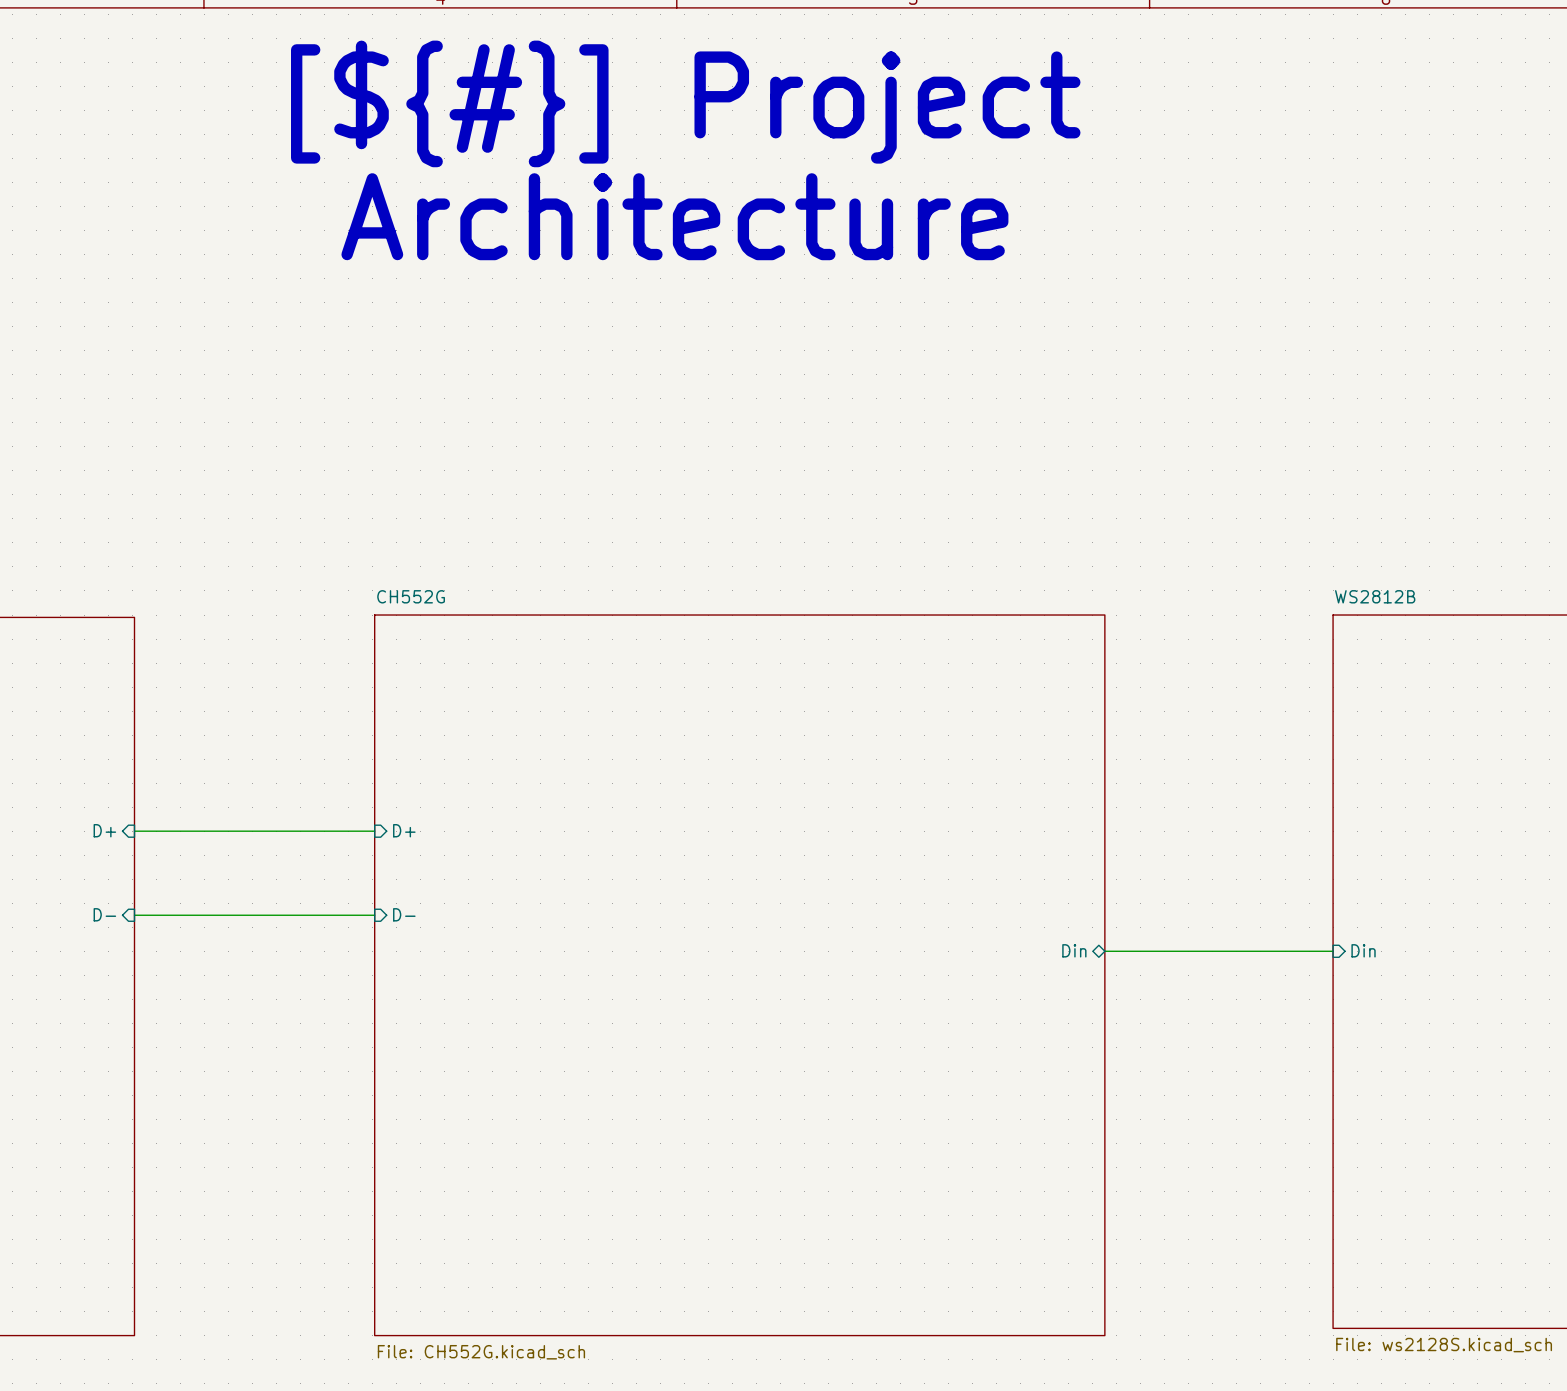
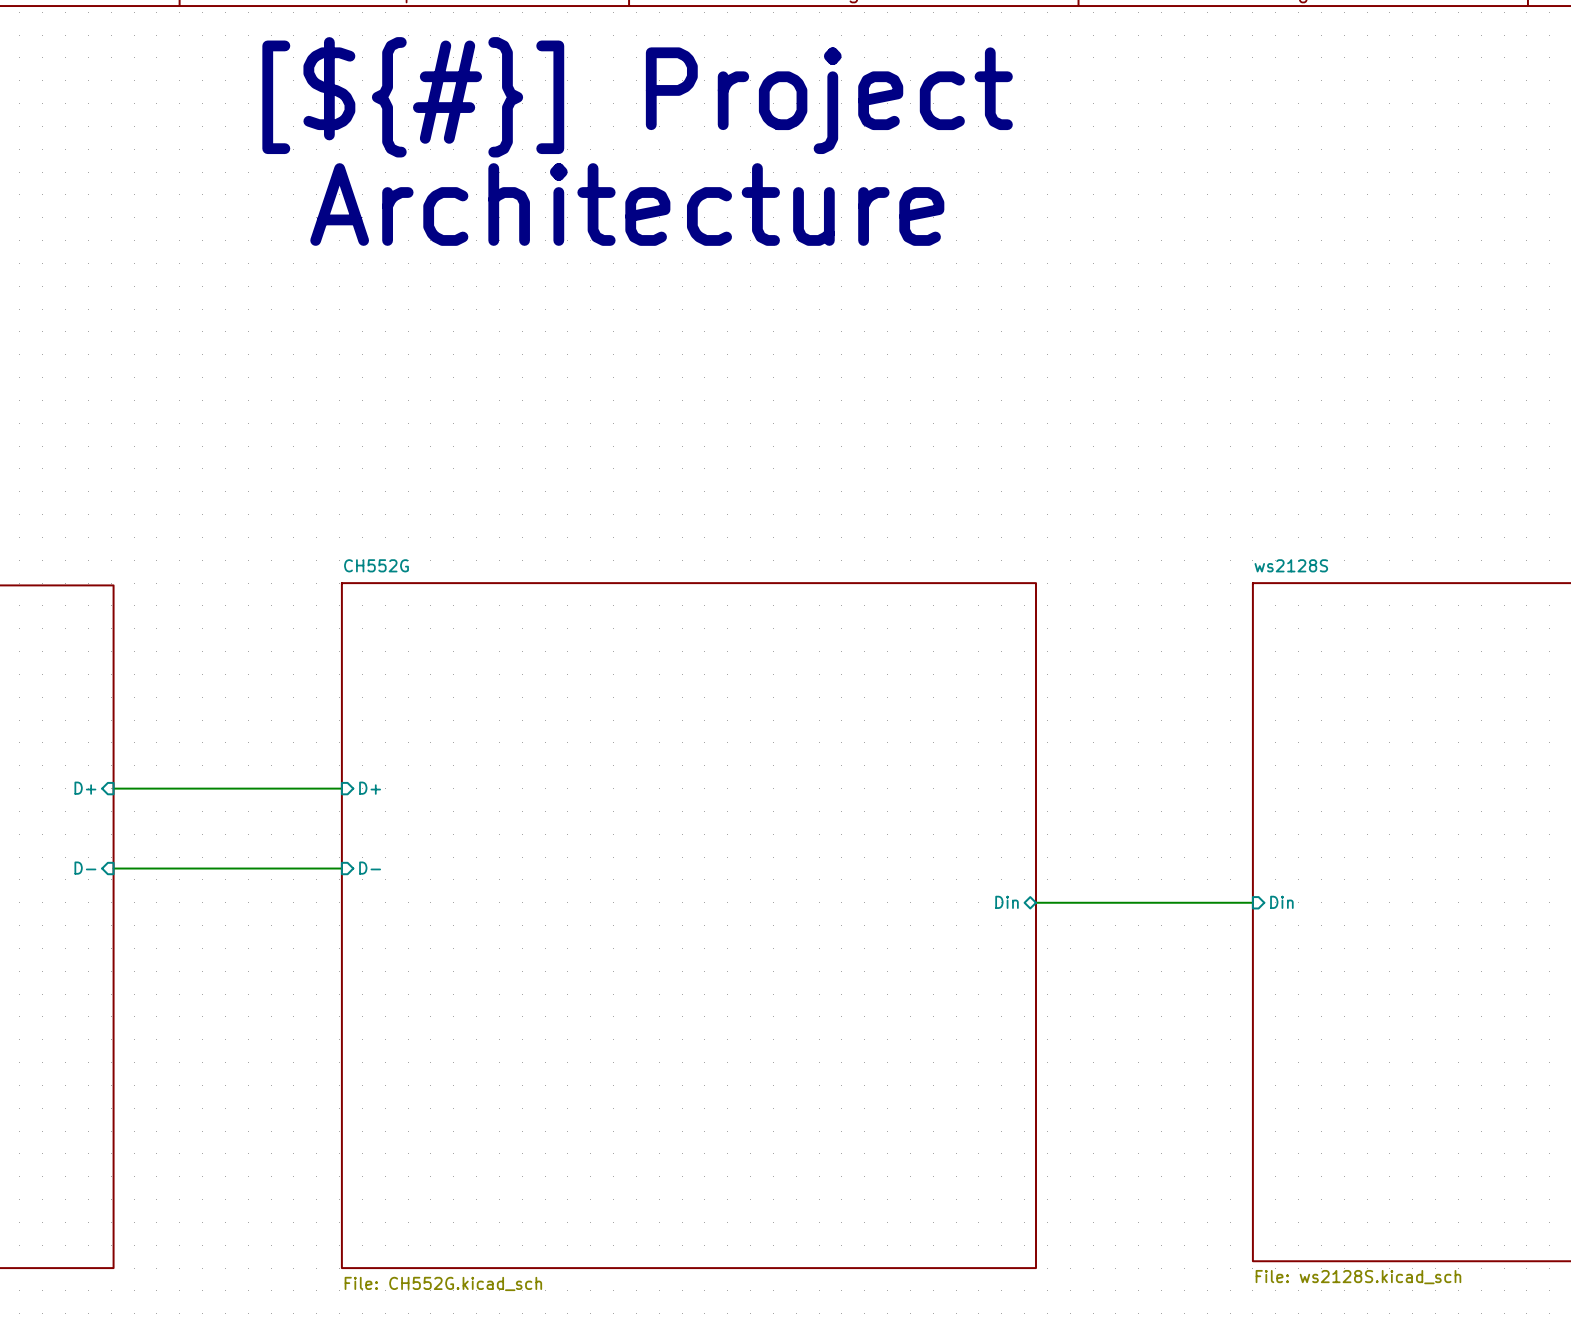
sheet WS2812B name: WS2812B (1375, 596) -> ws2128S (1291, 565)

